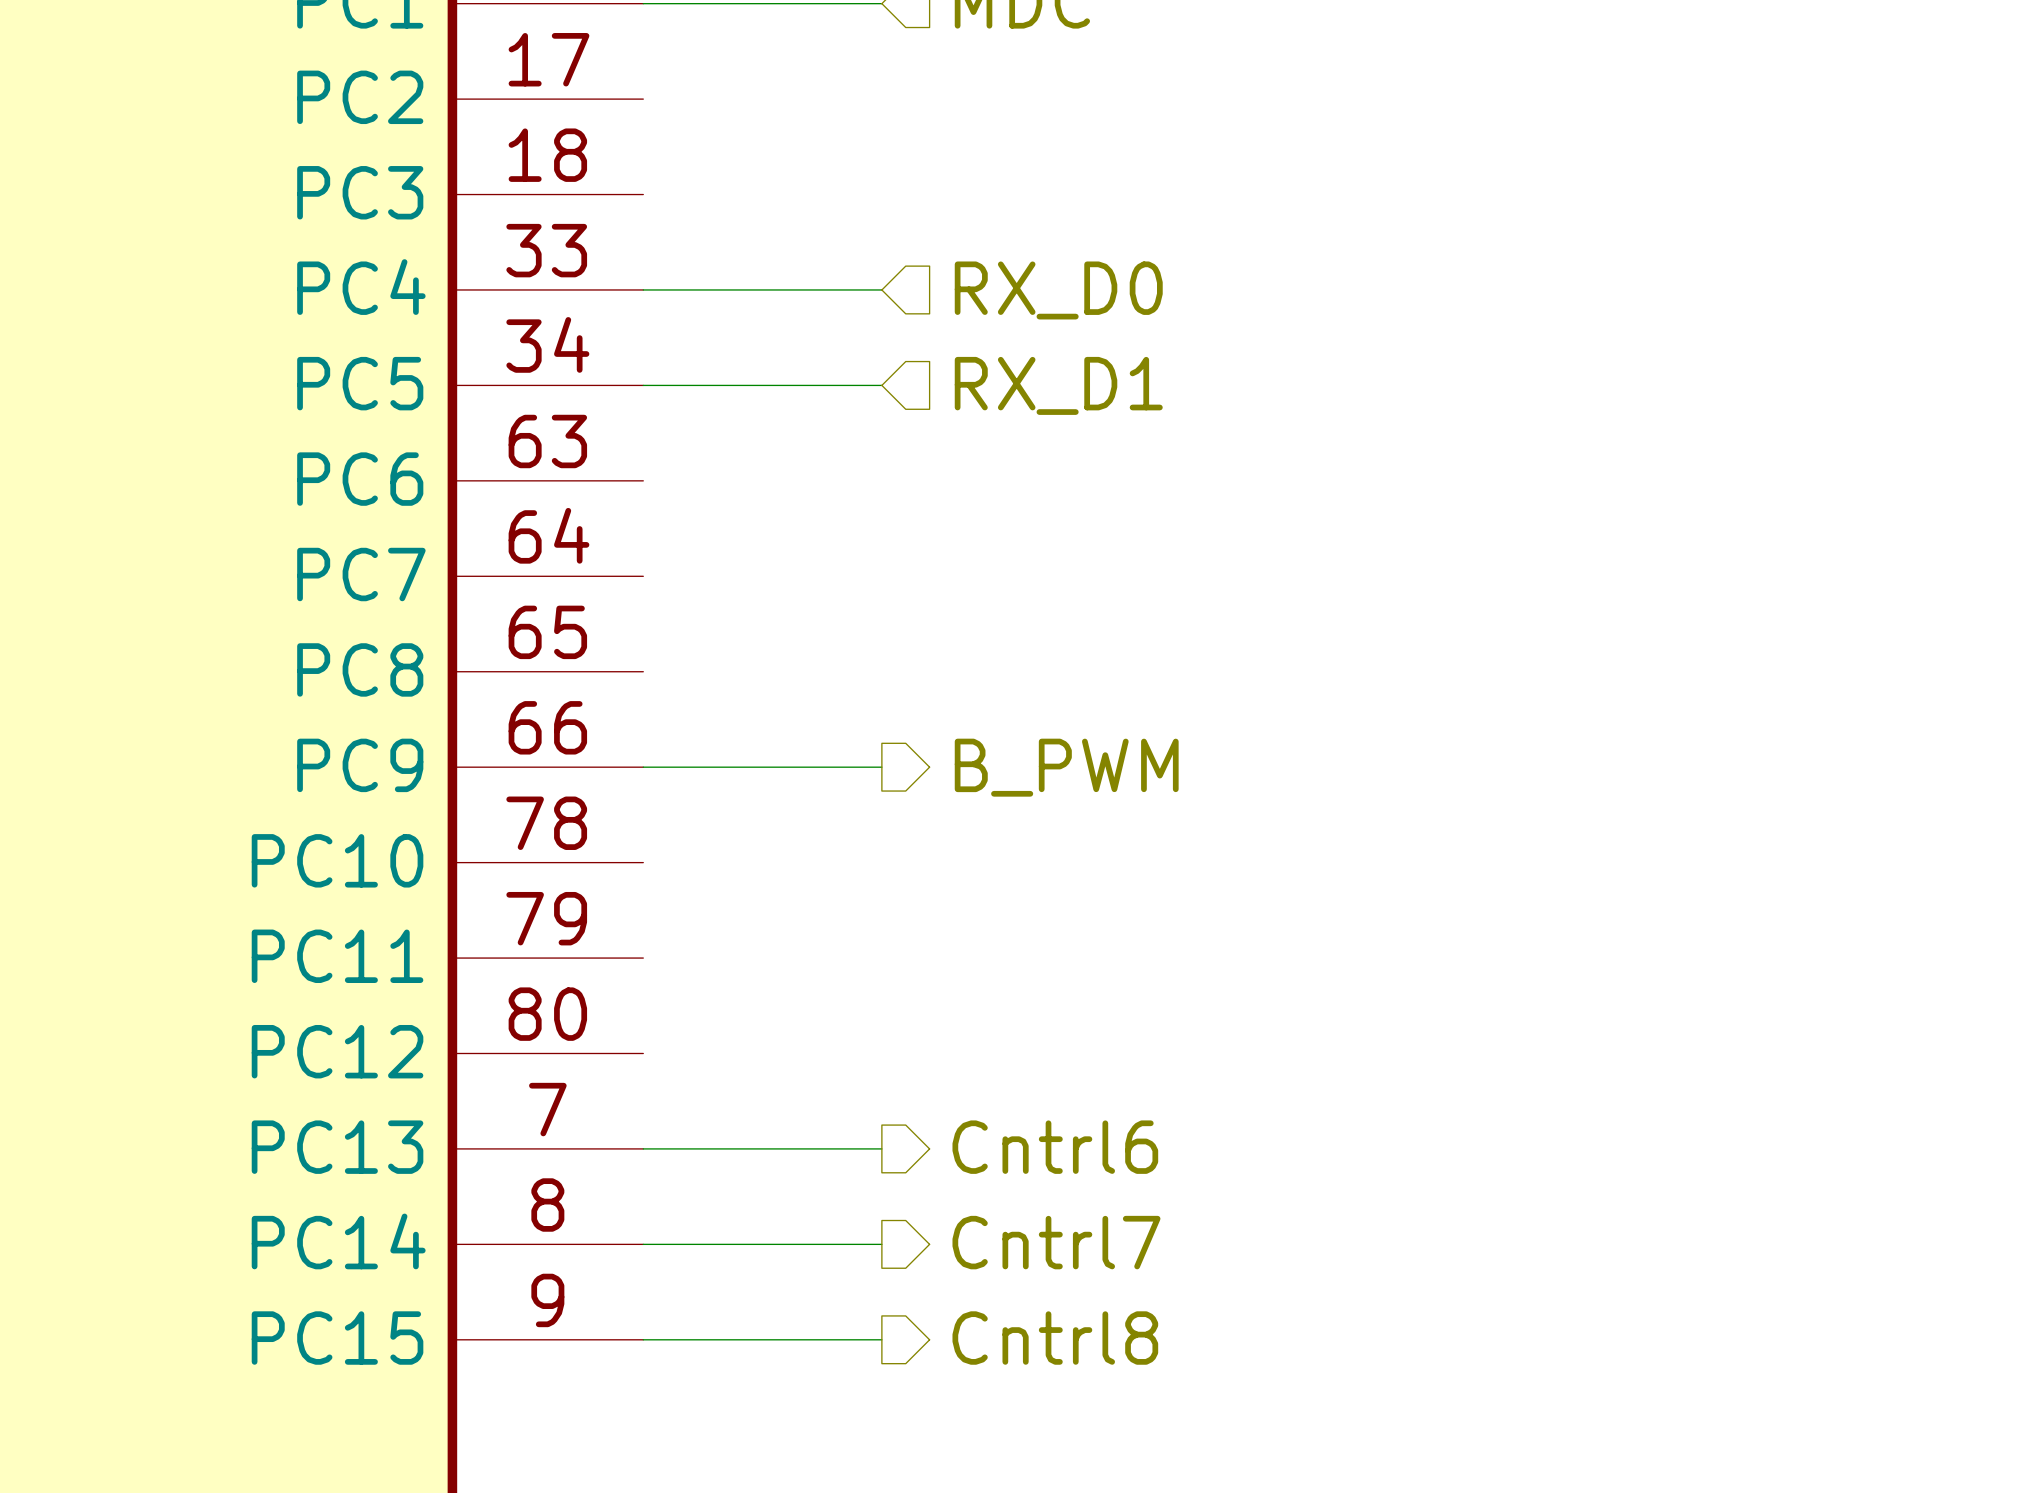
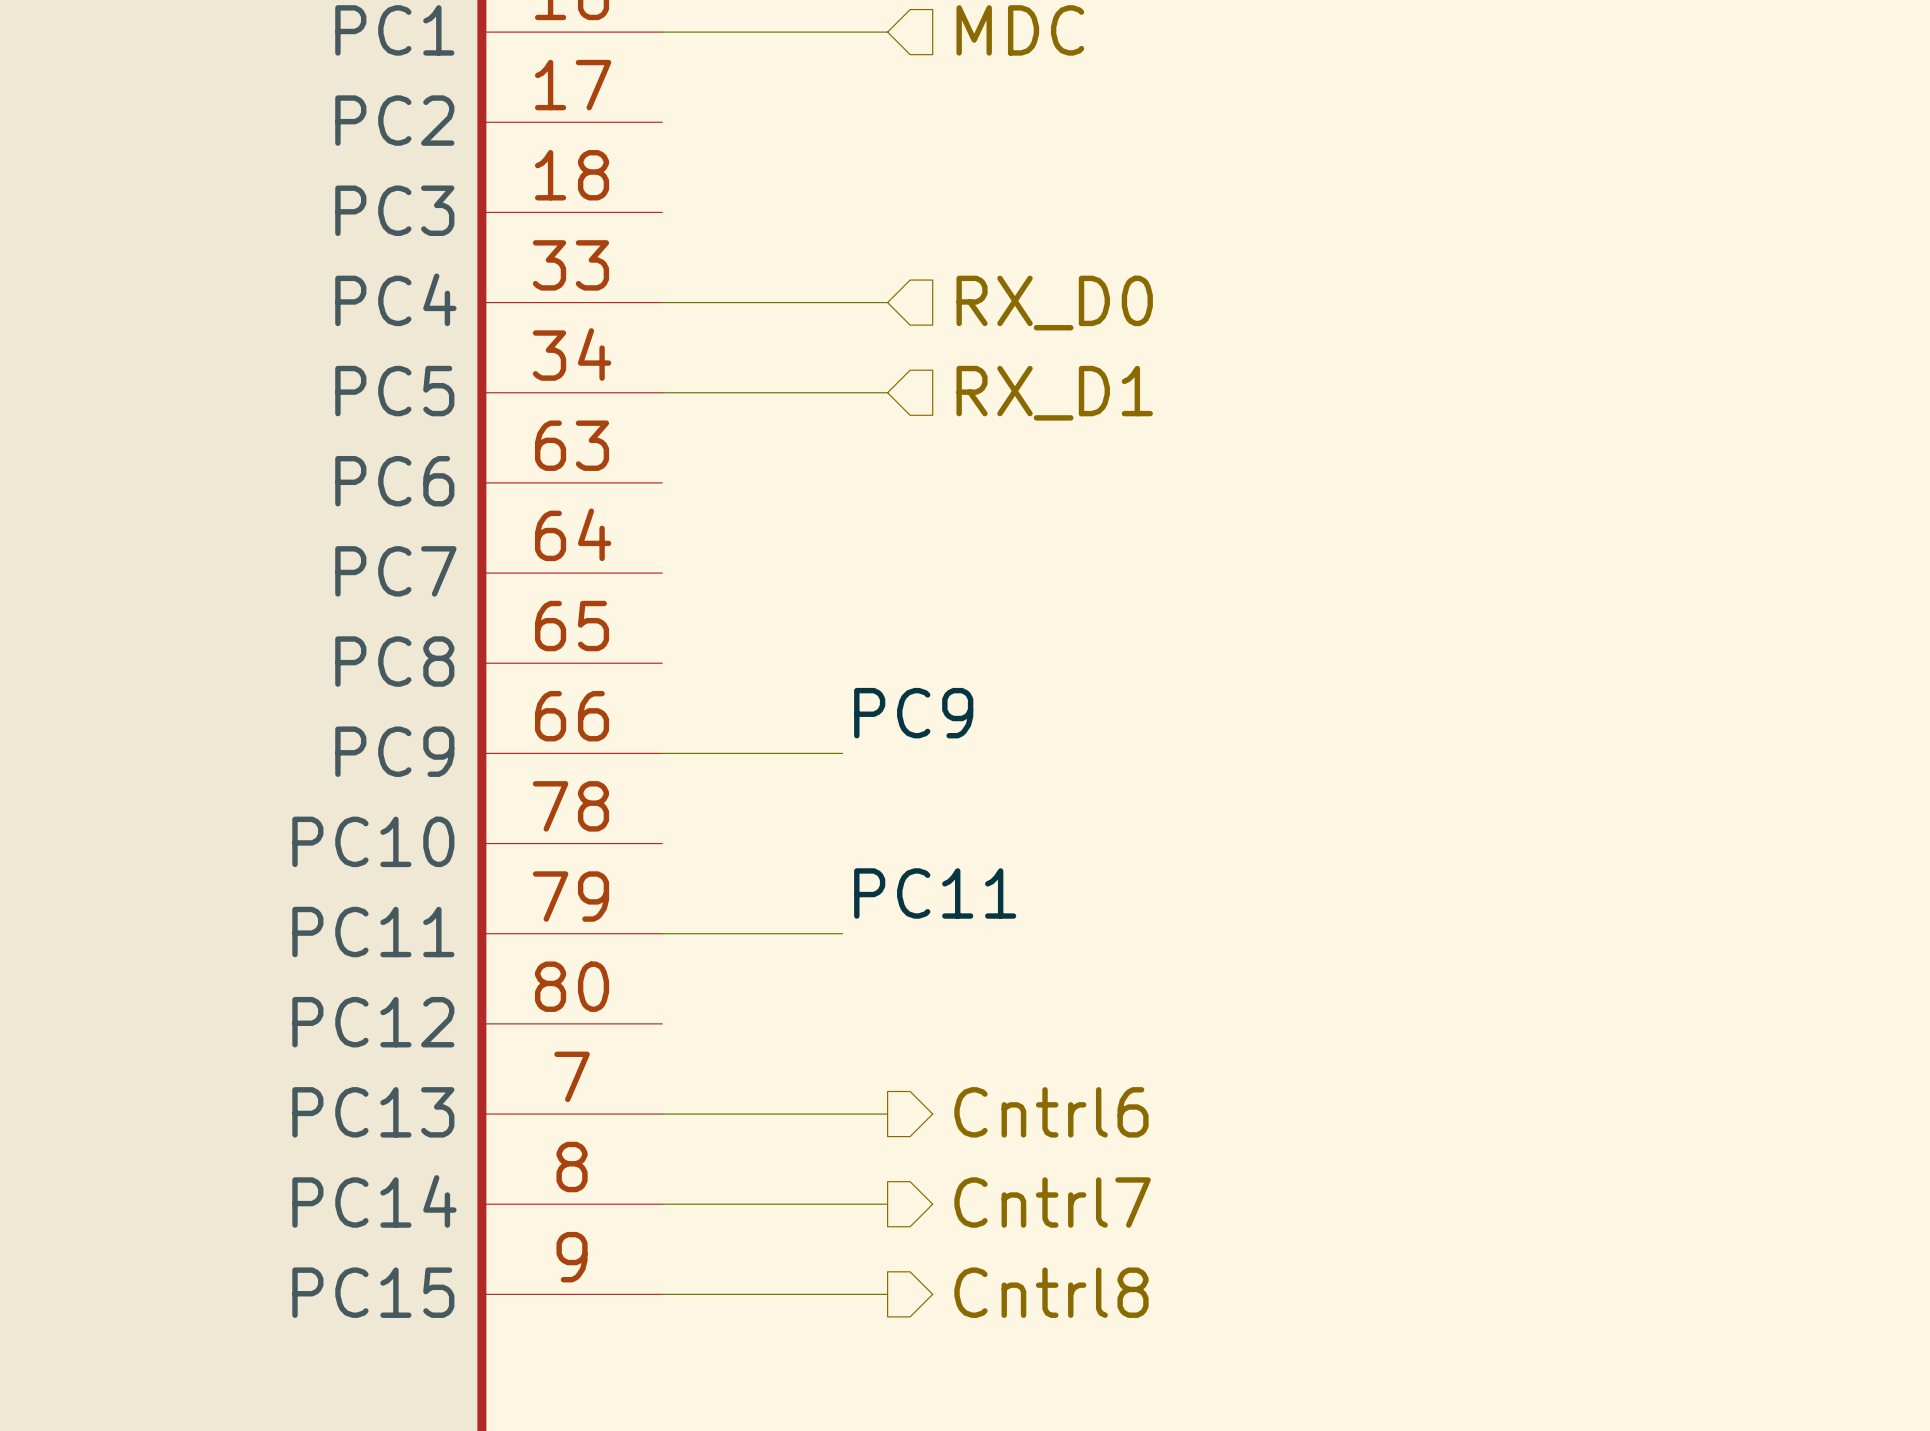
label: none -> PC9 (913, 713)
wire: (834, 767) (881, 767) -> none
hierarchical label: B_PWM (1066, 767) -> none
label: none -> PC11 (935, 893)
wire: none -> (662, 933) (842, 933)

